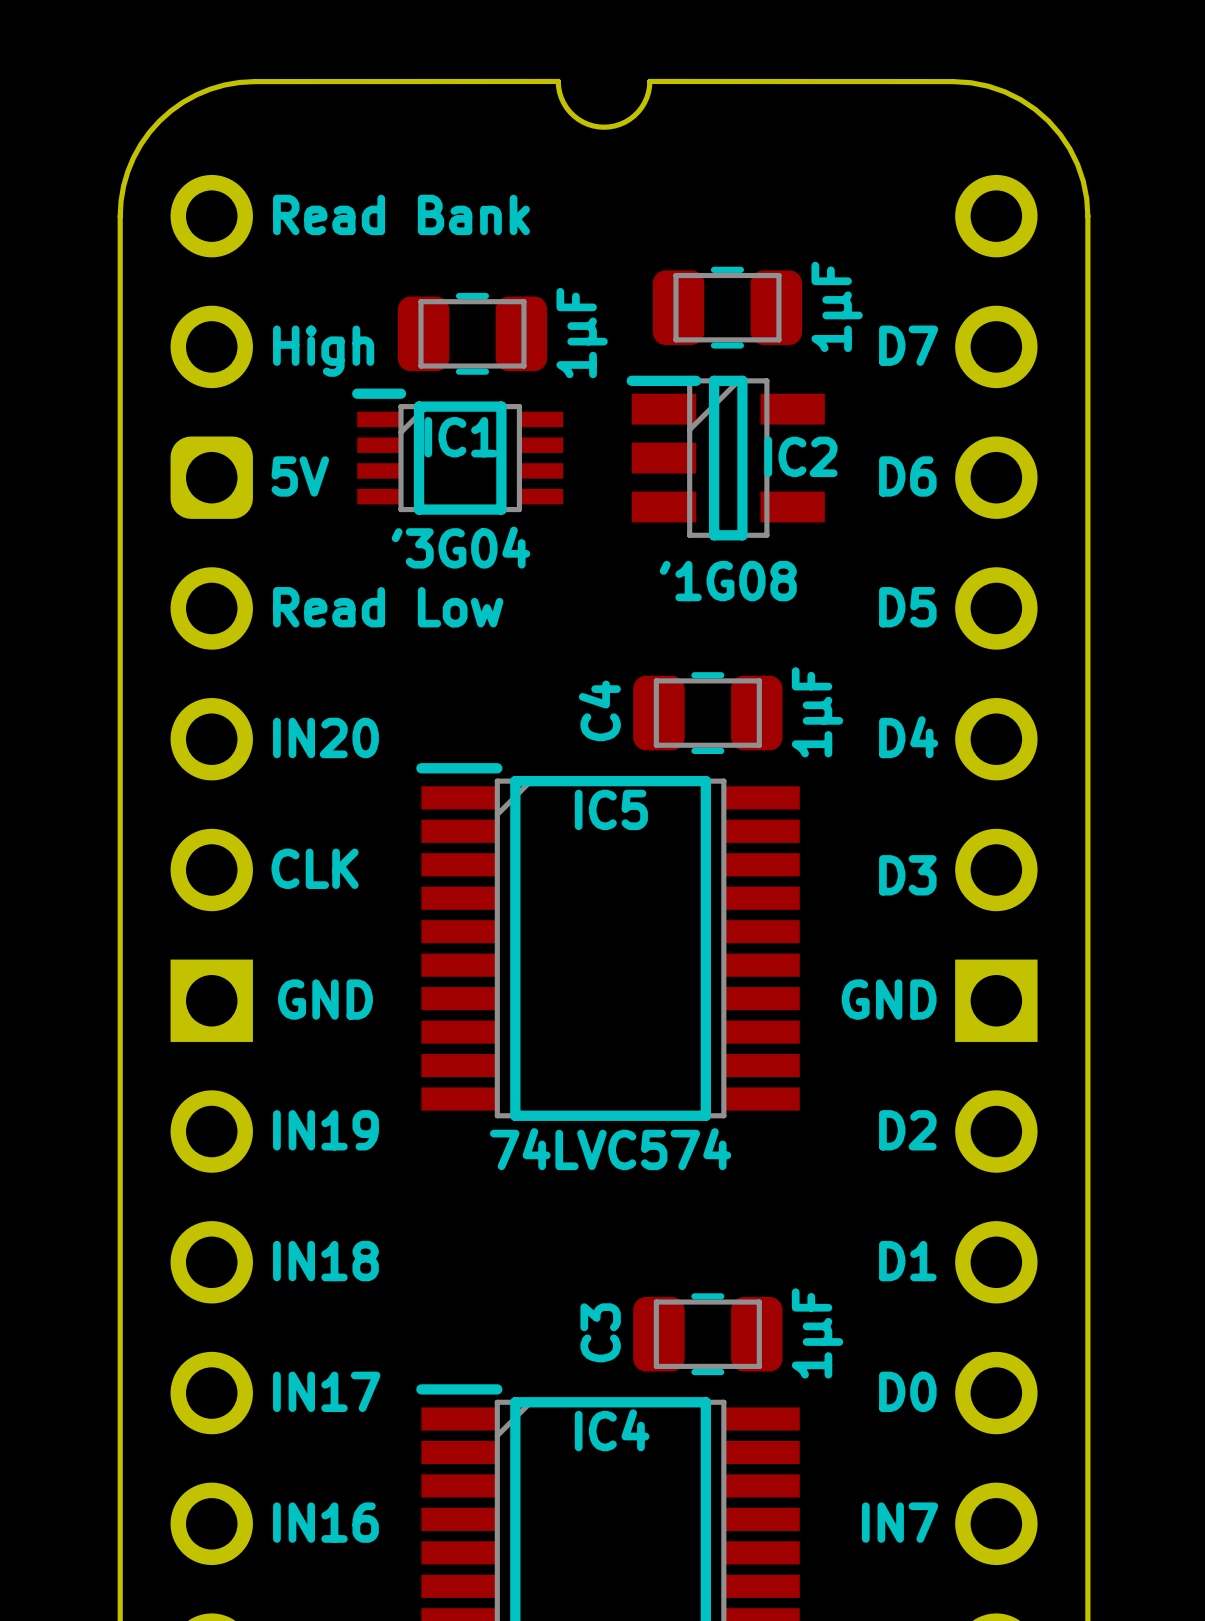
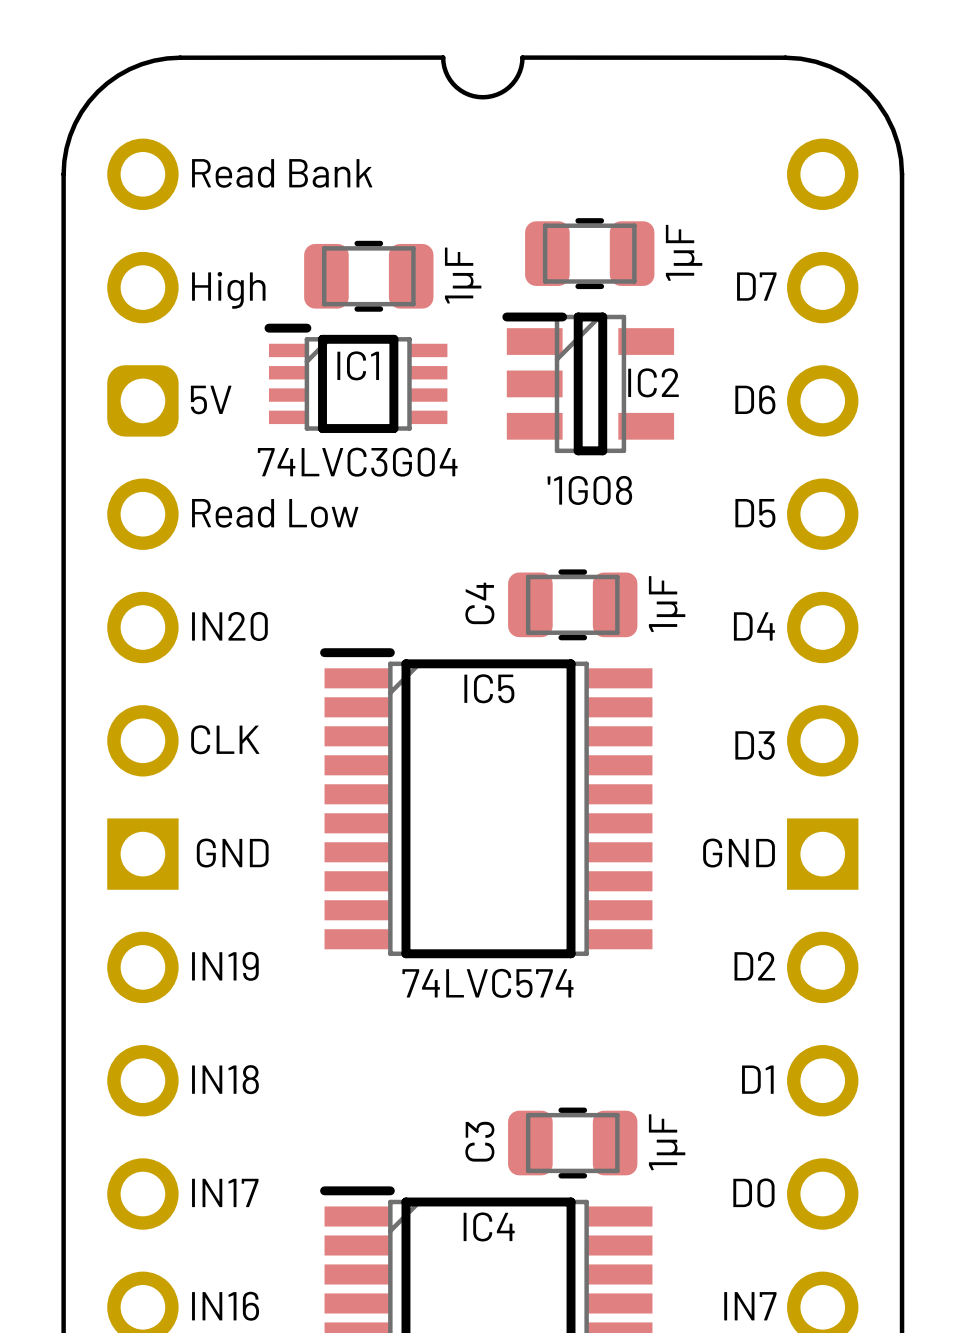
IC1 text: none -> 74LVC3G04 (357, 462)
IC1 text: '3G04 (460, 547) -> none

